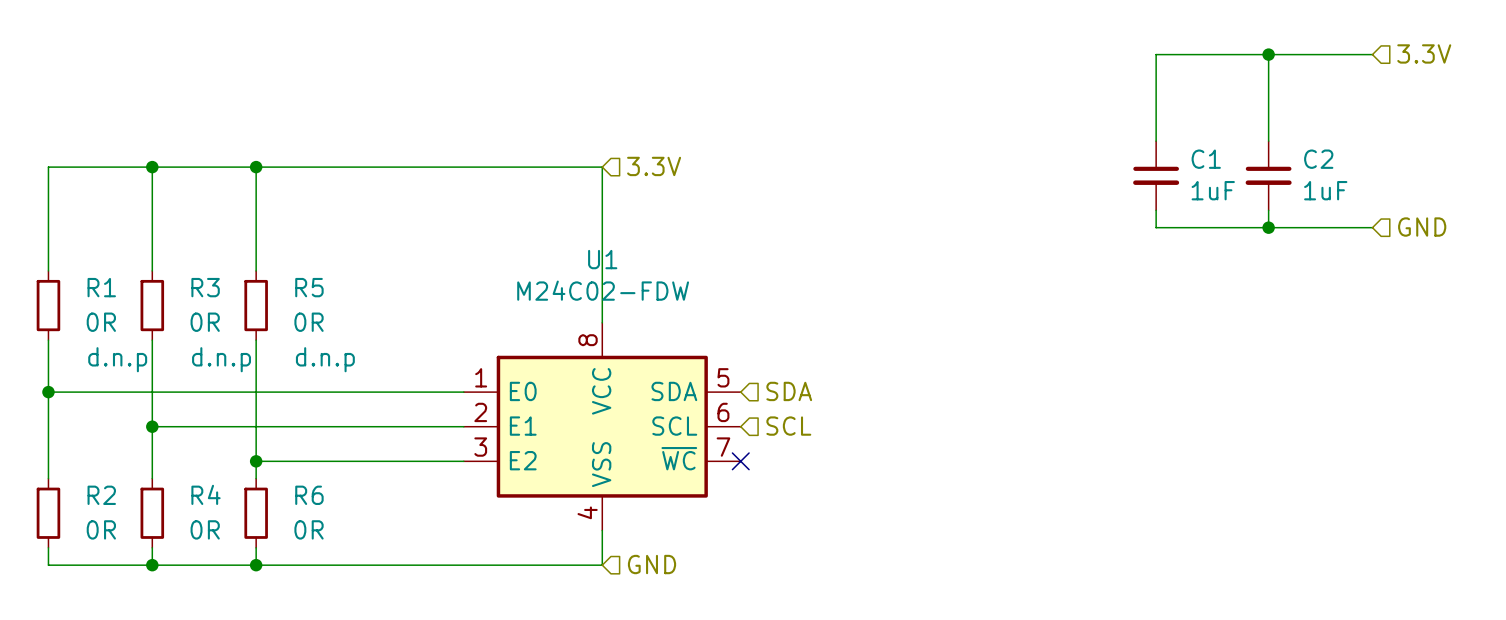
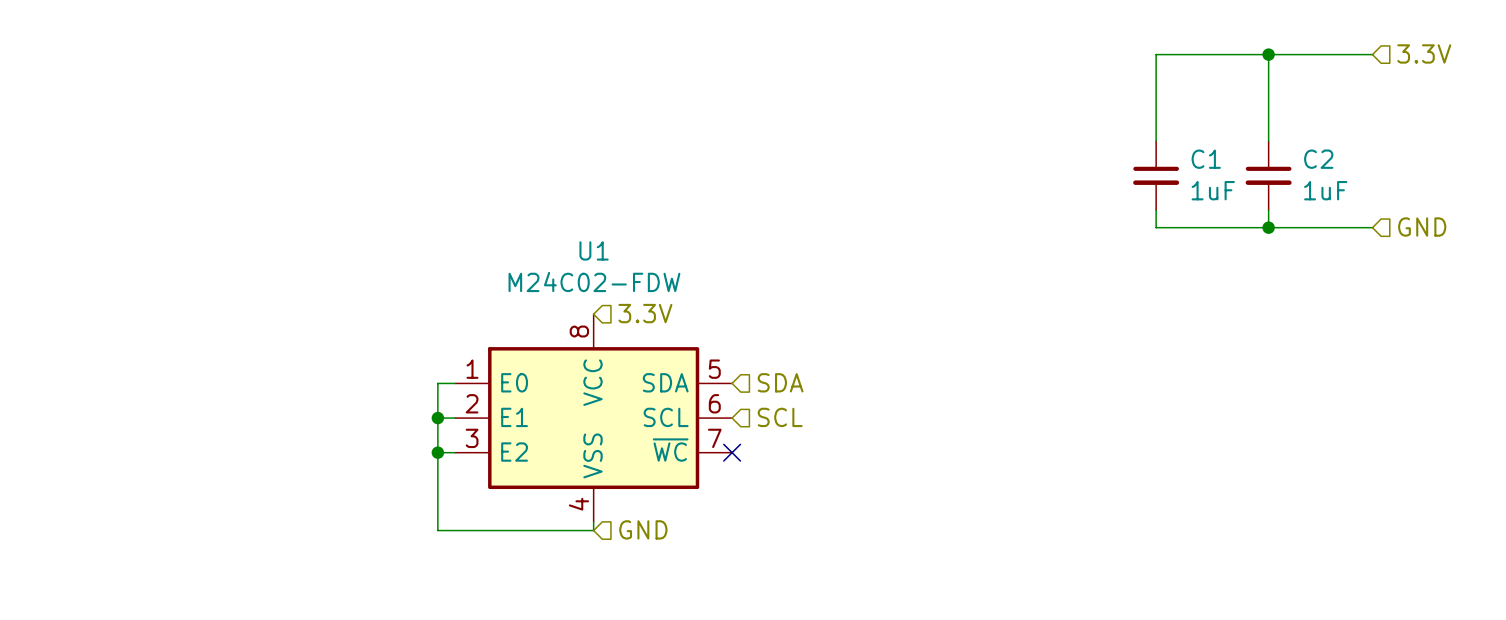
hierarchical label position: 3.3V (654, 166) -> 3.3V (645, 313)
wire: (152, 167) (152, 270) -> none
junction: (152, 167) -> none
wire: (256, 167) (256, 270) -> none
junction: (256, 167) -> none
wire: (48, 270) (48, 167) (602, 167) (602, 322) -> none
R1: 0R (48, 305) -> none
R3: 0R (152, 305) -> none
R5: 0R (256, 305) -> none
wire: (48, 340) (48, 478) -> none
wire: (152, 340) (152, 478) -> none
wire: (256, 340) (256, 478) -> none
wire: none -> (455, 383) (437, 383) (437, 530) (593, 530) (593, 521)
hierarchical label position: SDA (789, 391) -> SDA (780, 382)
wire: (48, 392) (463, 392) -> none
junction: (48, 392) -> none
wire: none -> (437, 418) (455, 418)
junction: none -> (437, 418)
wire: (152, 426) (463, 426) -> none
junction: (152, 426) -> none
U1 position: (602, 426) -> (593, 418)
hierarchical label position: SCL (788, 426) -> SCL (780, 417)
wire: none -> (437, 452) (455, 452)
junction: none -> (437, 452)
wire: (256, 461) (463, 461) -> none
junction: (256, 461) -> none
no-connect mark position: (740, 461) -> (732, 452)
R2: 0R (48, 513) -> none
R4: 0R (152, 513) -> none
R6: 0R (256, 513) -> none
wire: (602, 530) (602, 565) (48, 565) (48, 547) -> none
wire: (152, 547) (152, 565) -> none
wire: (256, 547) (256, 565) -> none
hierarchical label position: GND (652, 564) -> GND (643, 529)
junction: (152, 565) -> none
junction: (256, 565) -> none

